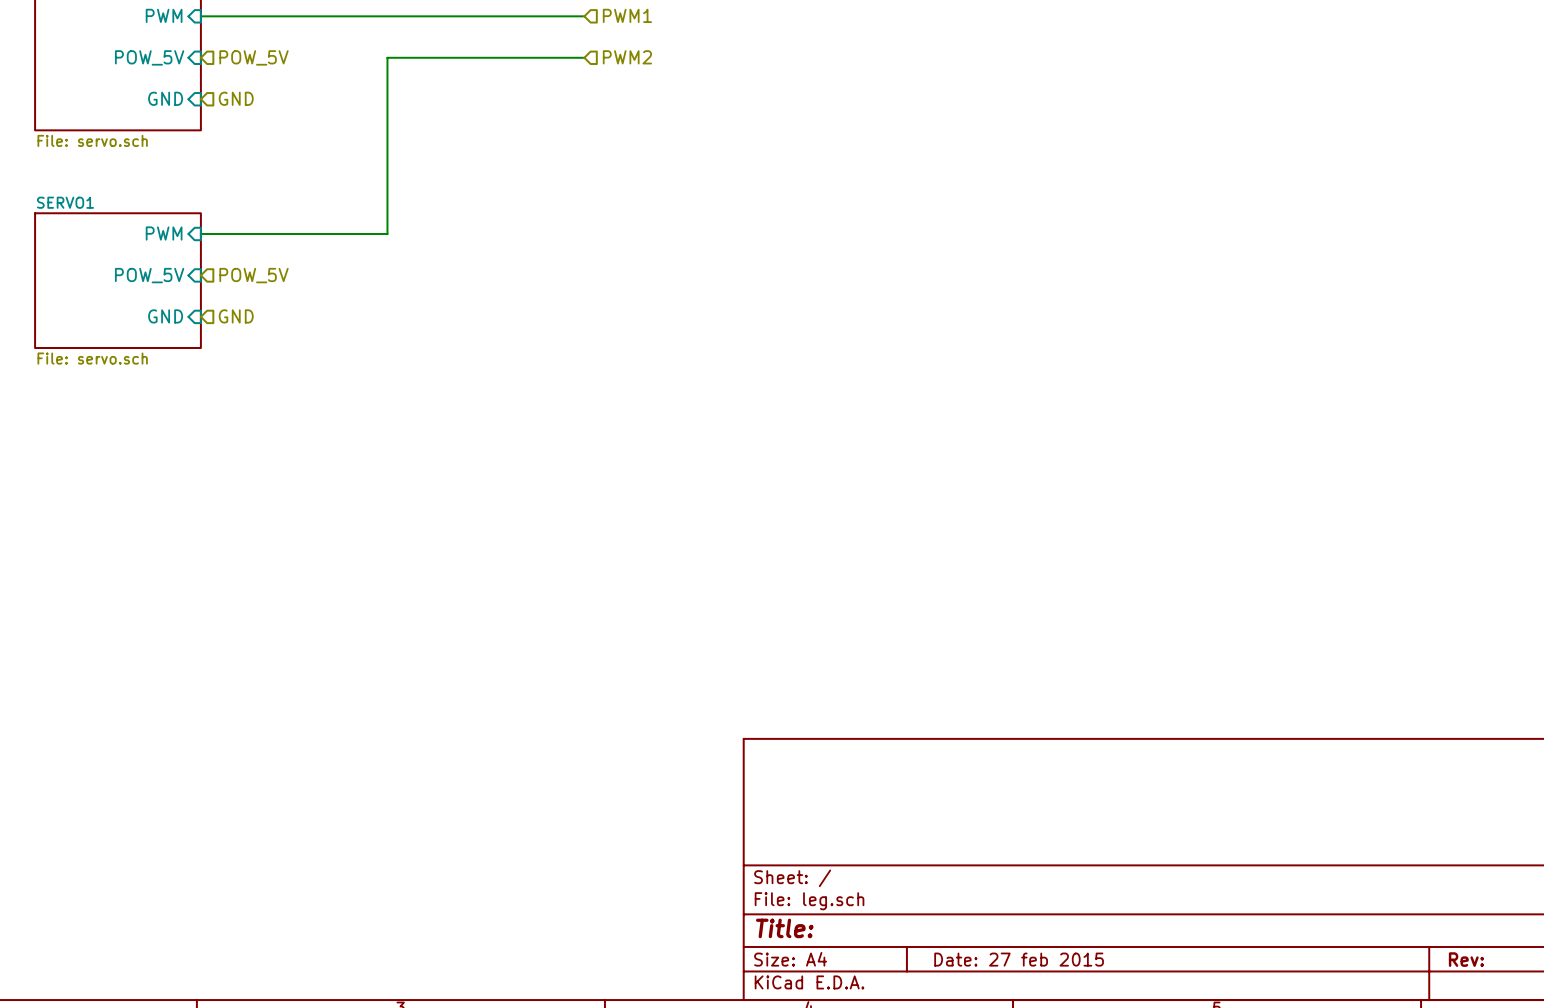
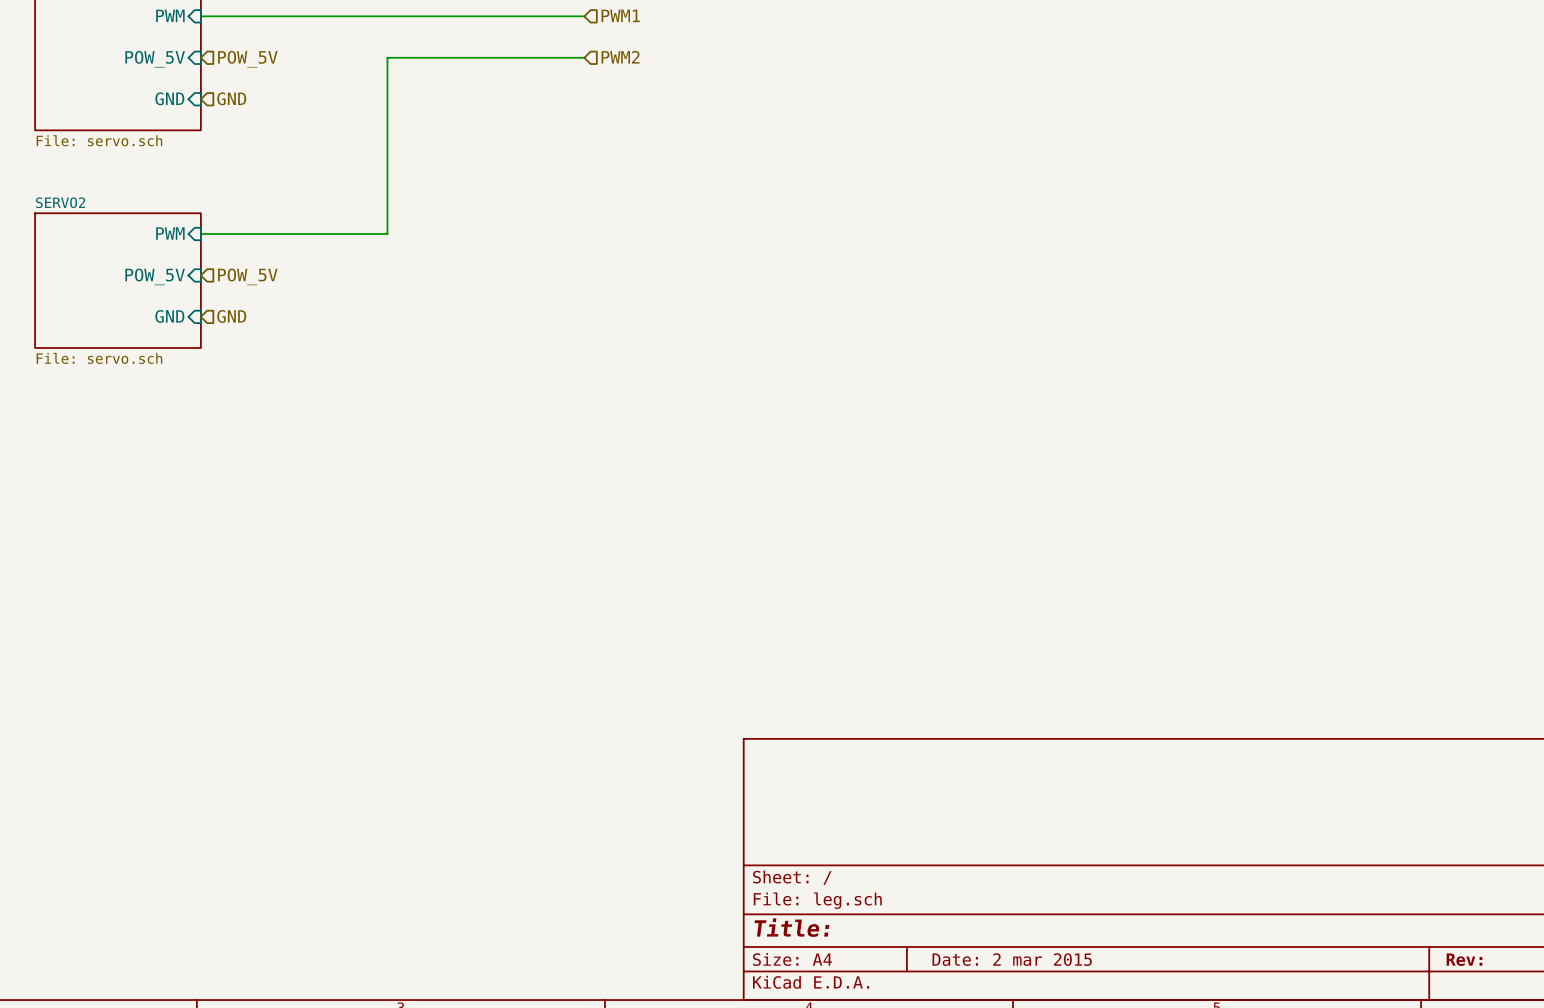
sheet SERVO1 name: SERVO1 (65, 202) -> SERVO2 (60, 202)
title block: Date: 27 feb 2015 (1019, 959) -> Date: 2 mar 2015 (1012, 959)

